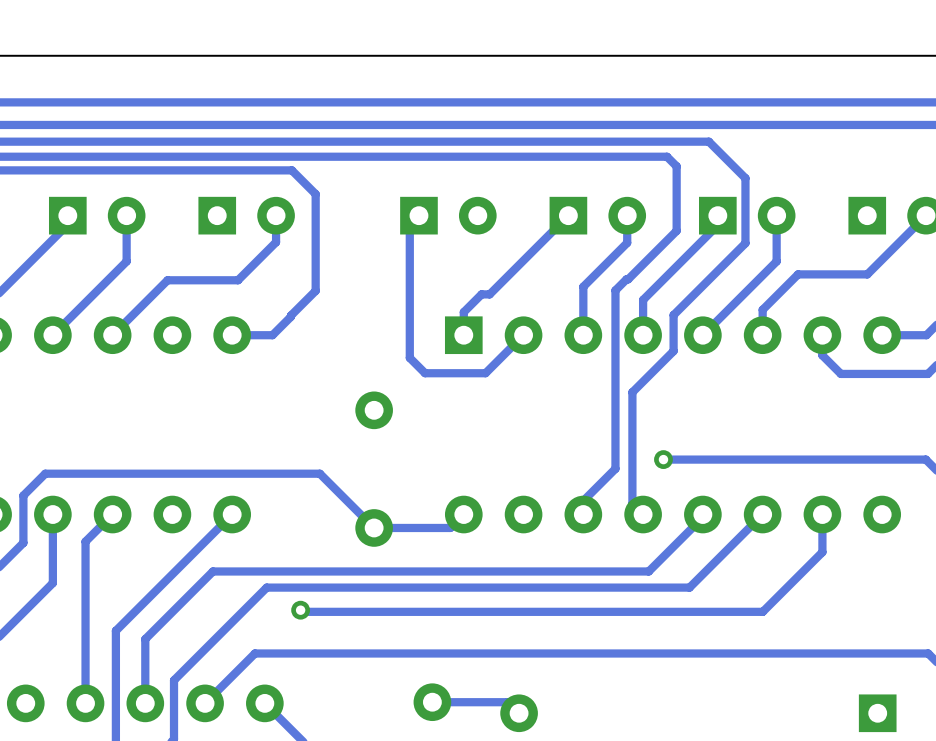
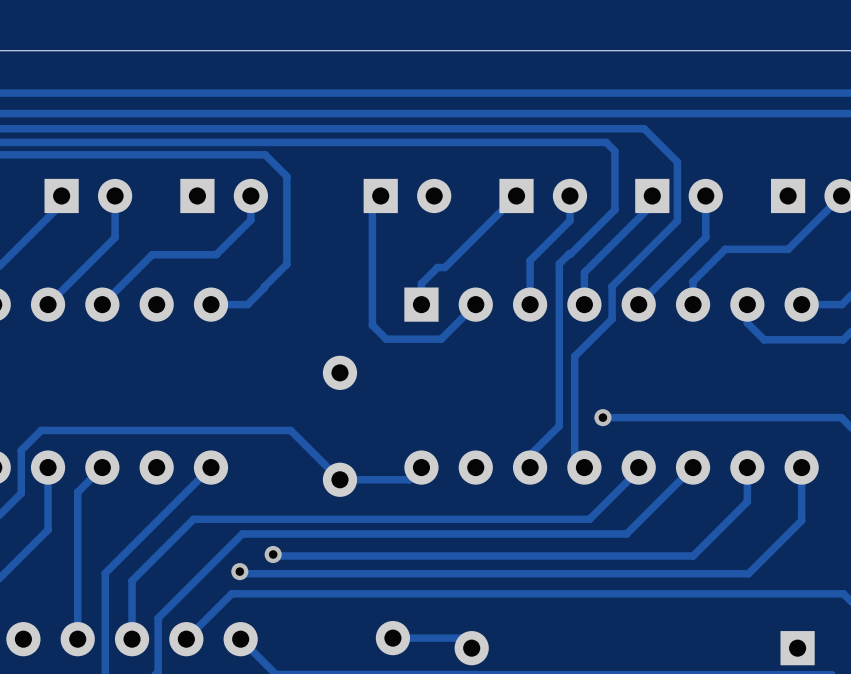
track: none -> (801, 467) (801, 520) (748, 573) (241, 573) (239, 571)
via: none -> (239, 571)

